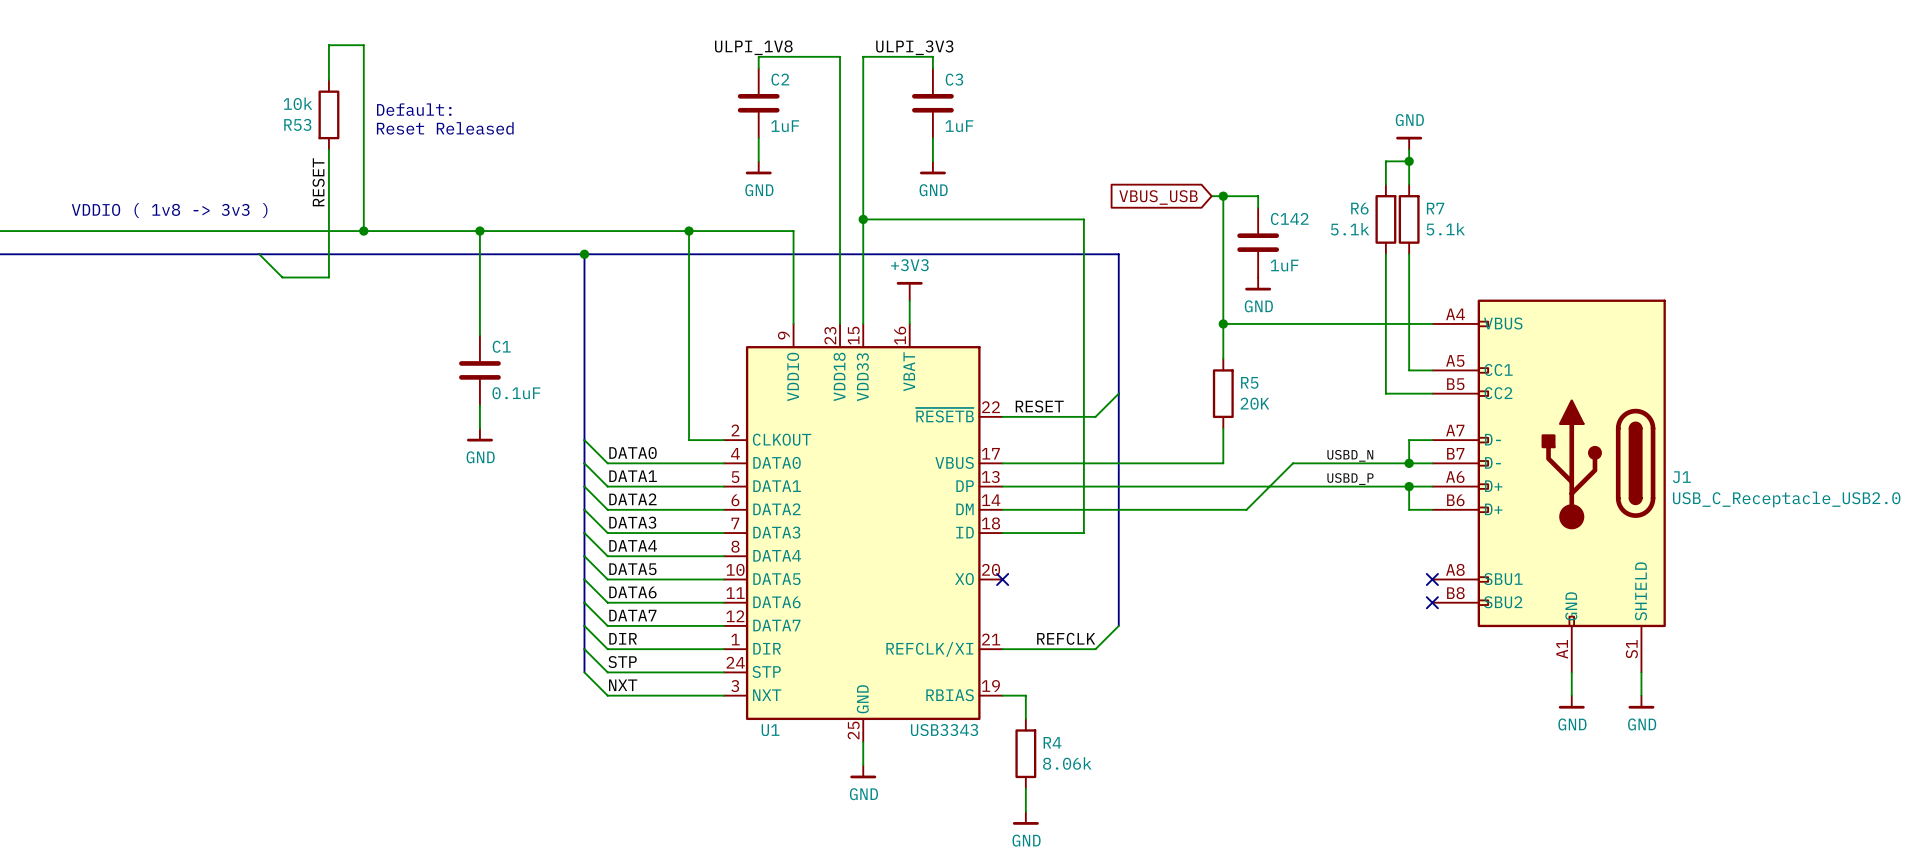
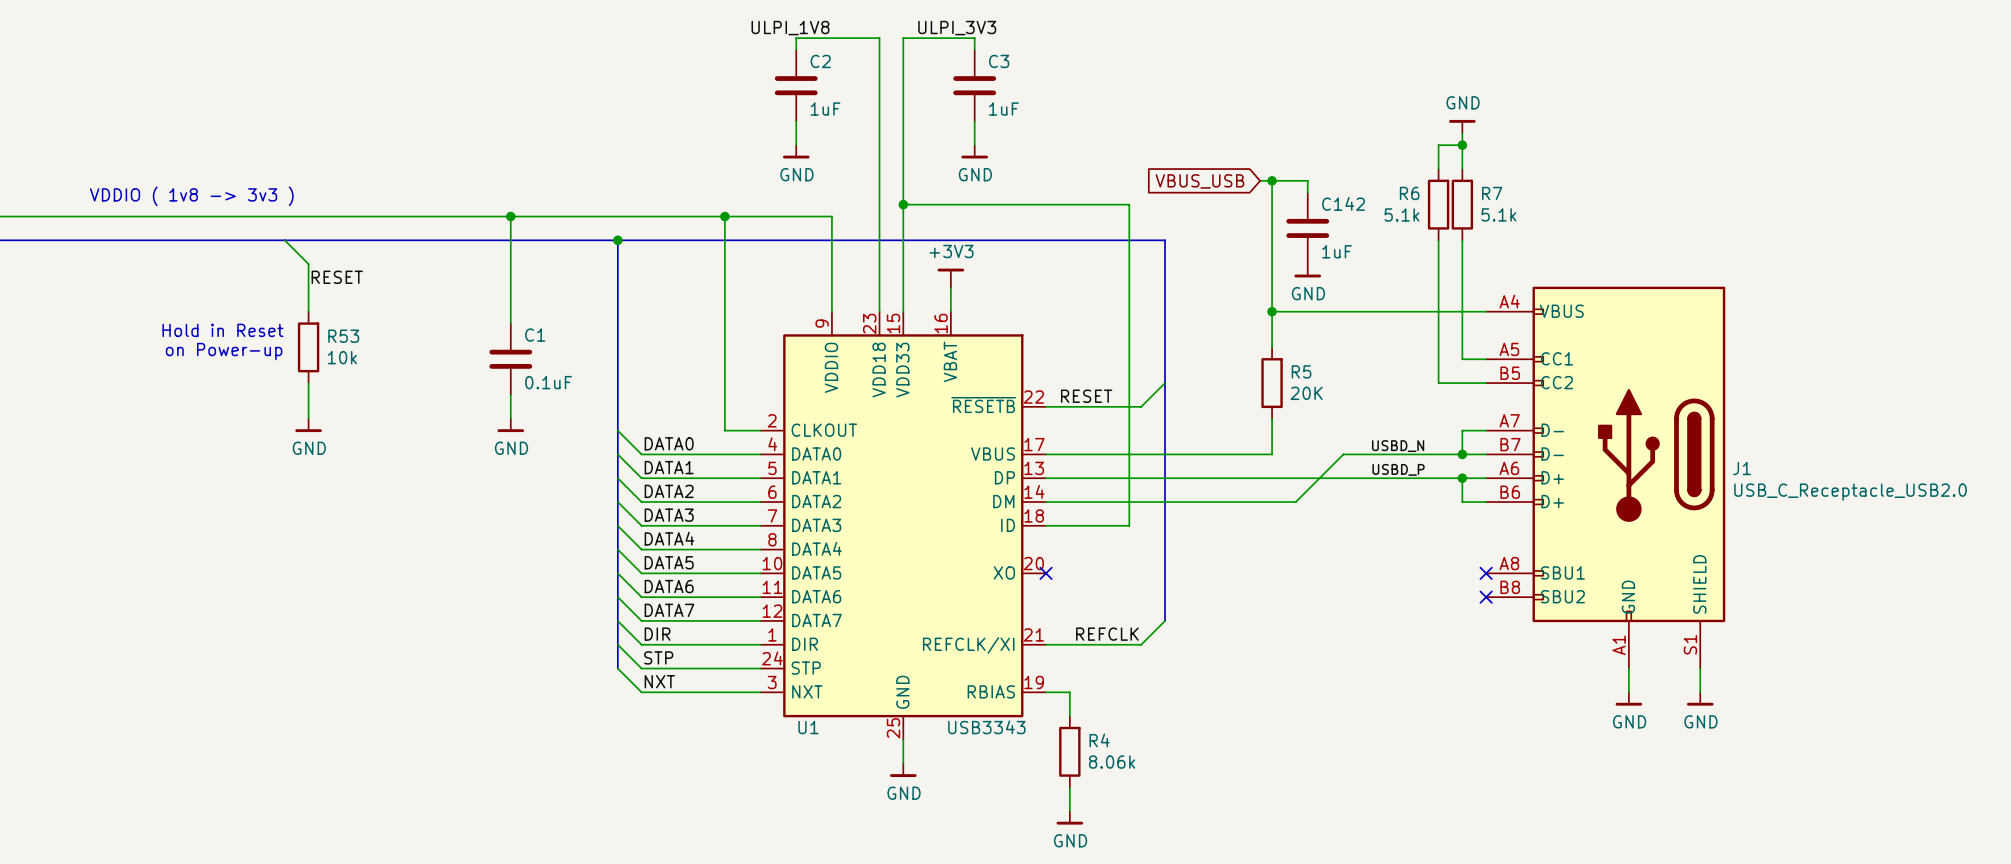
wire: (328, 80) (328, 45) (363, 45) (363, 231) -> none
R53 value position: 10k (297, 103) -> 10k (342, 357)
text: Default: (414, 109) -> none
R53 position: (328, 114) -> (308, 347)
R53 name position: R53 (297, 124) -> R53 (343, 336)
text: Reset Released (445, 128) -> none
wire: (328, 149) (328, 277) (282, 277) -> (308, 311) (308, 264)
label rotation: 0° (318, 182) -> 90° clockwise (337, 277)
label position: RESET (318, 182) -> RESET (337, 277)
junction: (363, 231) -> none
text: none -> Hold in Reset (222, 330)
text: none -> on Power-up (224, 351)
wire: none -> (308, 383) (308, 418)
power symbol: none -> GND (308, 425)

